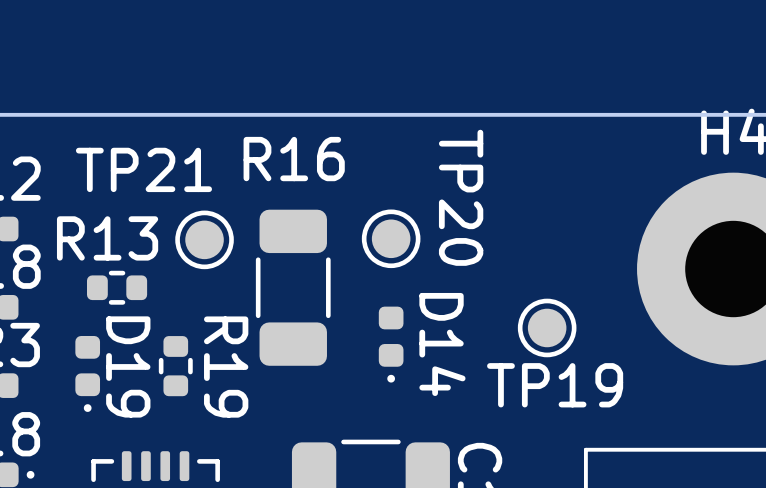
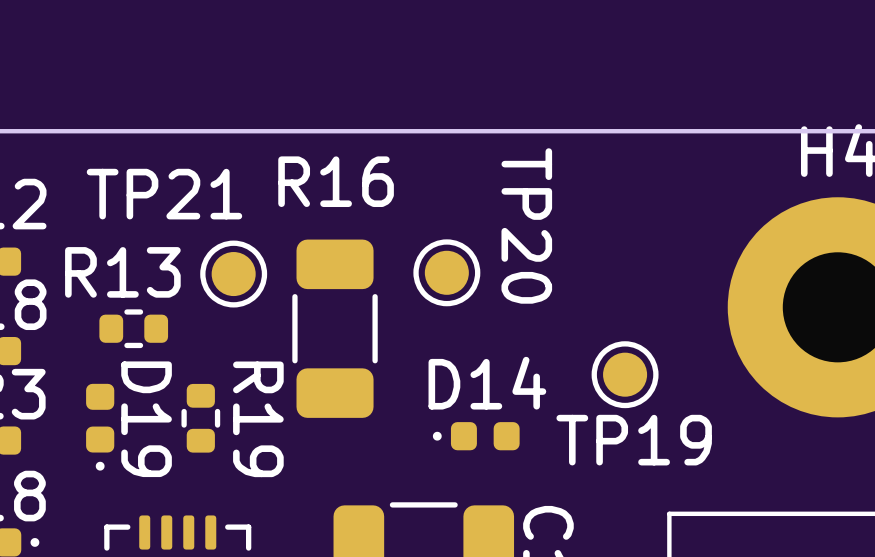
D14 rotation: 0° (391, 344) -> 90° clockwise (476, 436)

